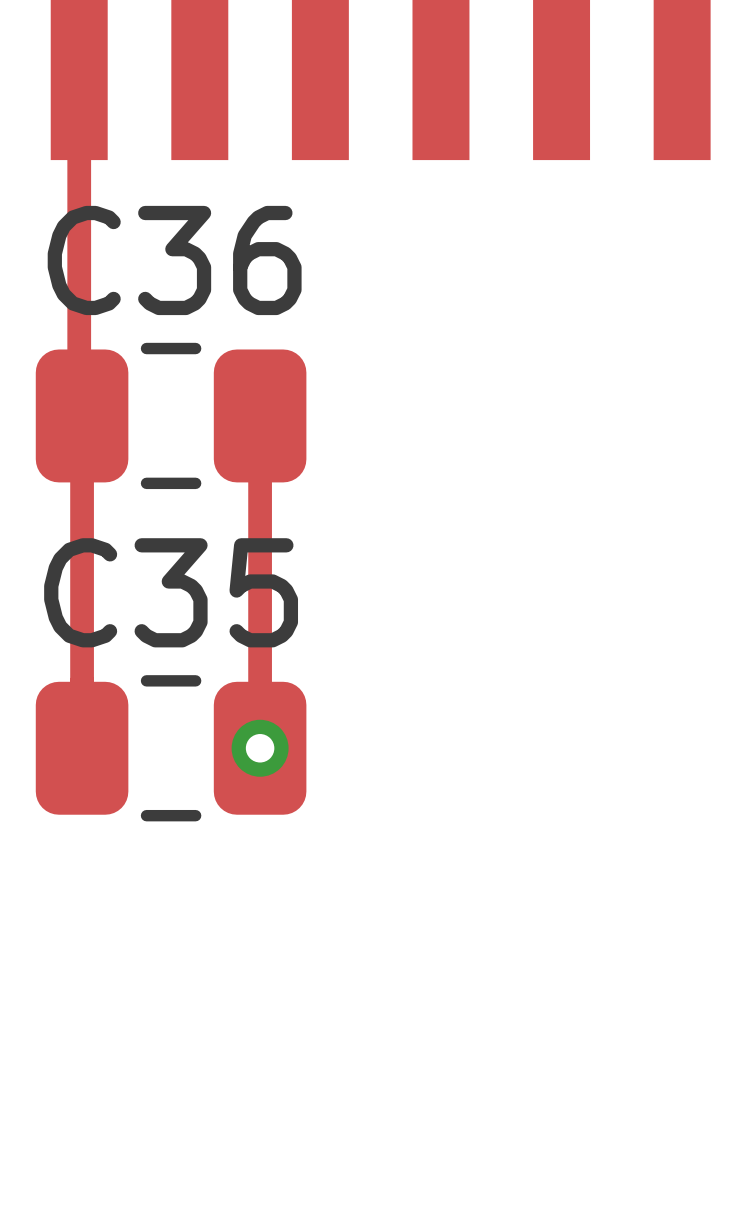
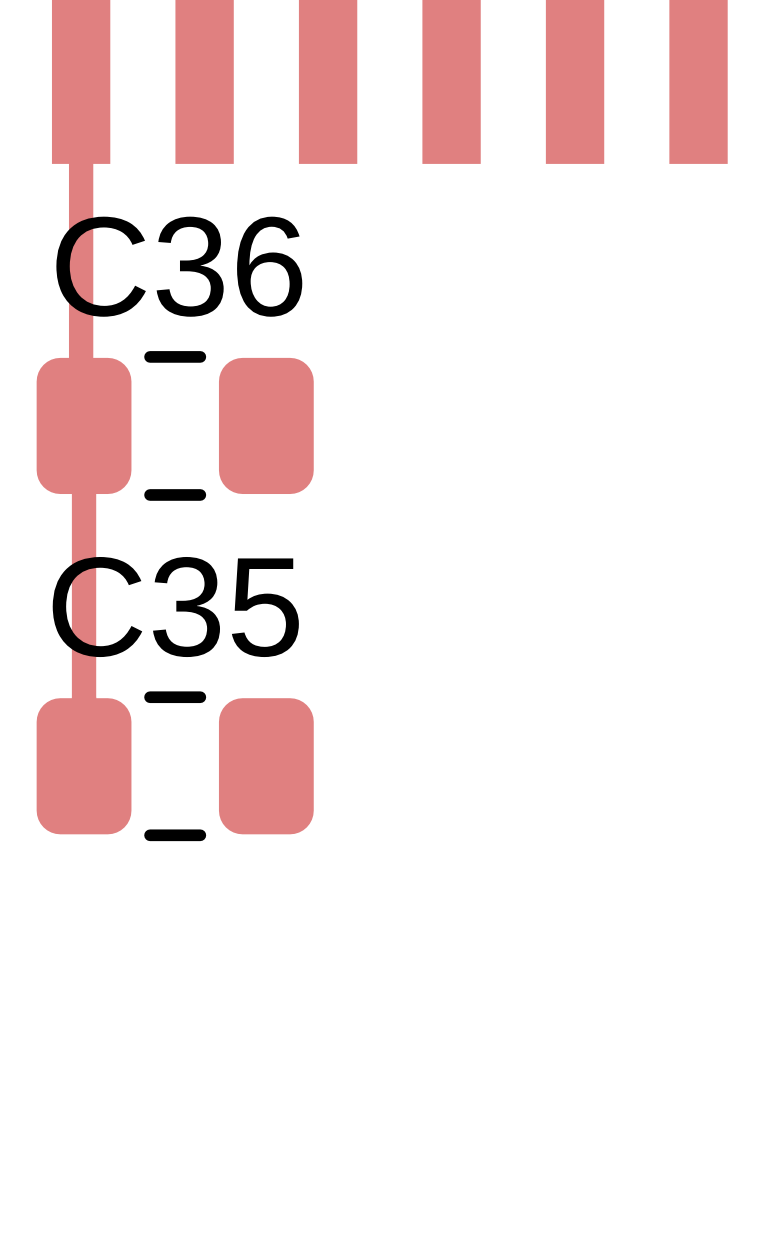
track: (260, 415) (260, 748) -> none
via: (260, 748) -> none

